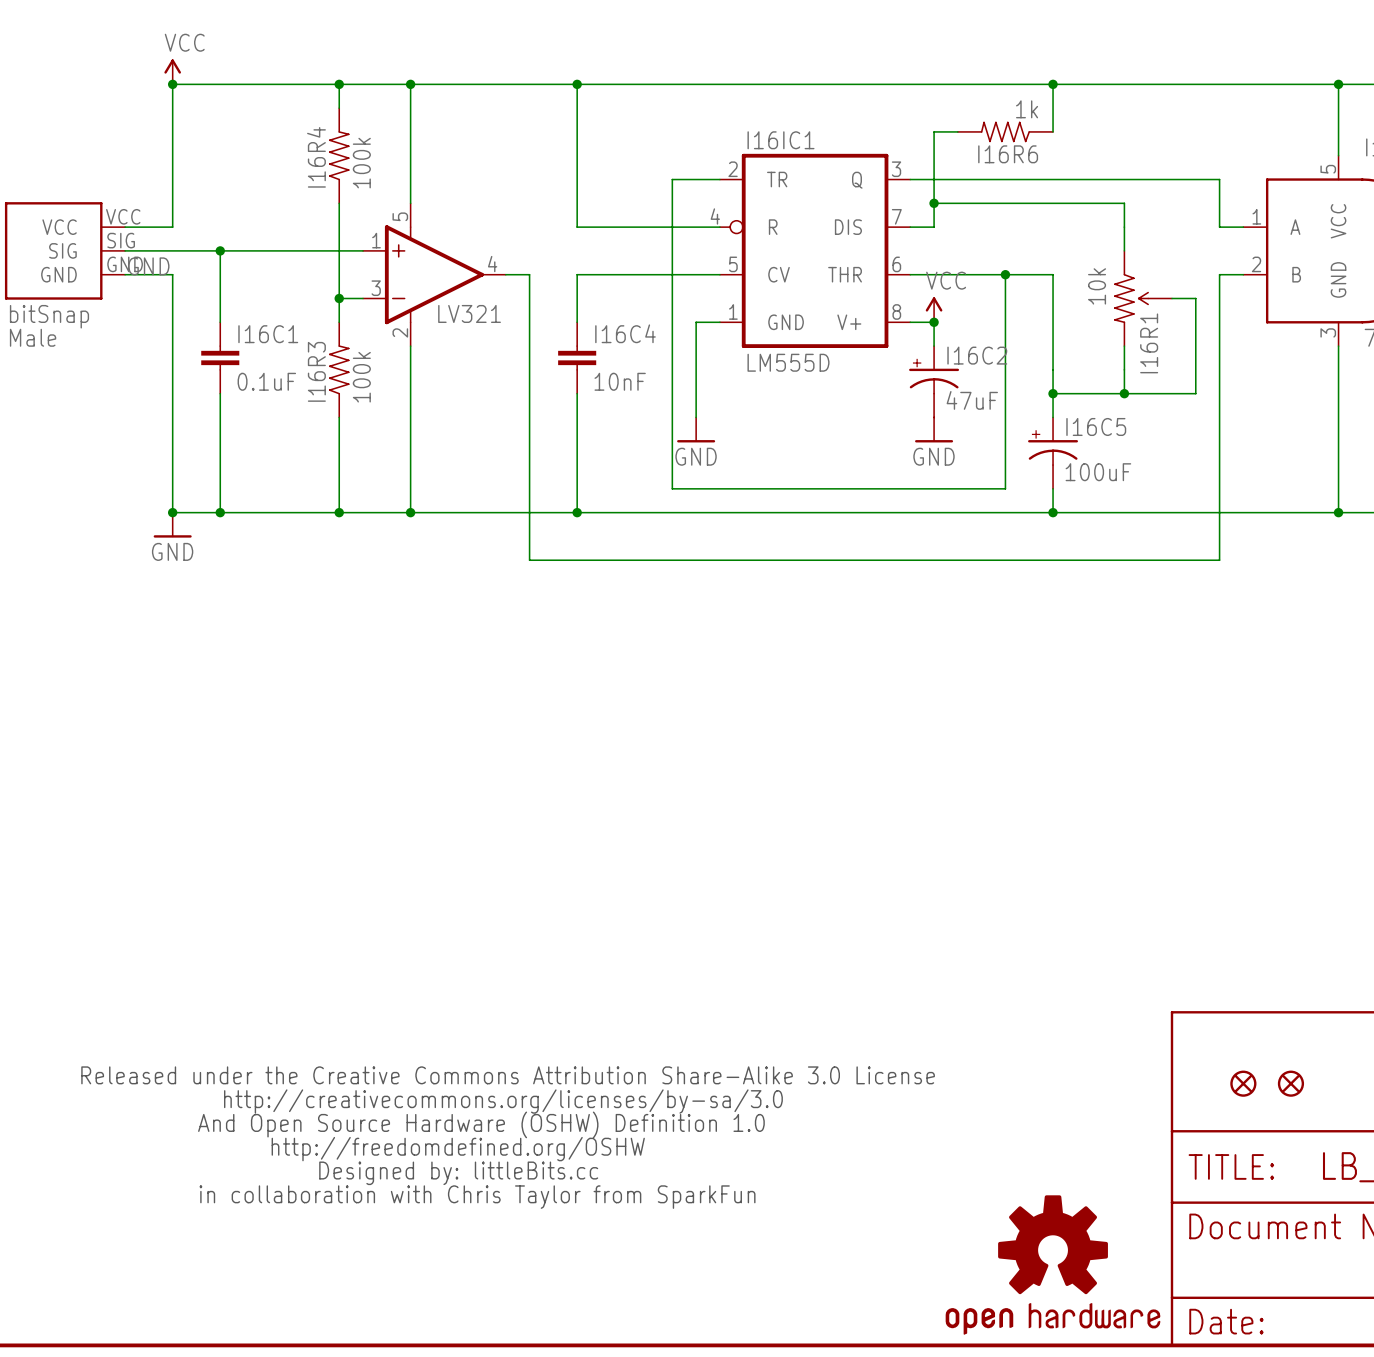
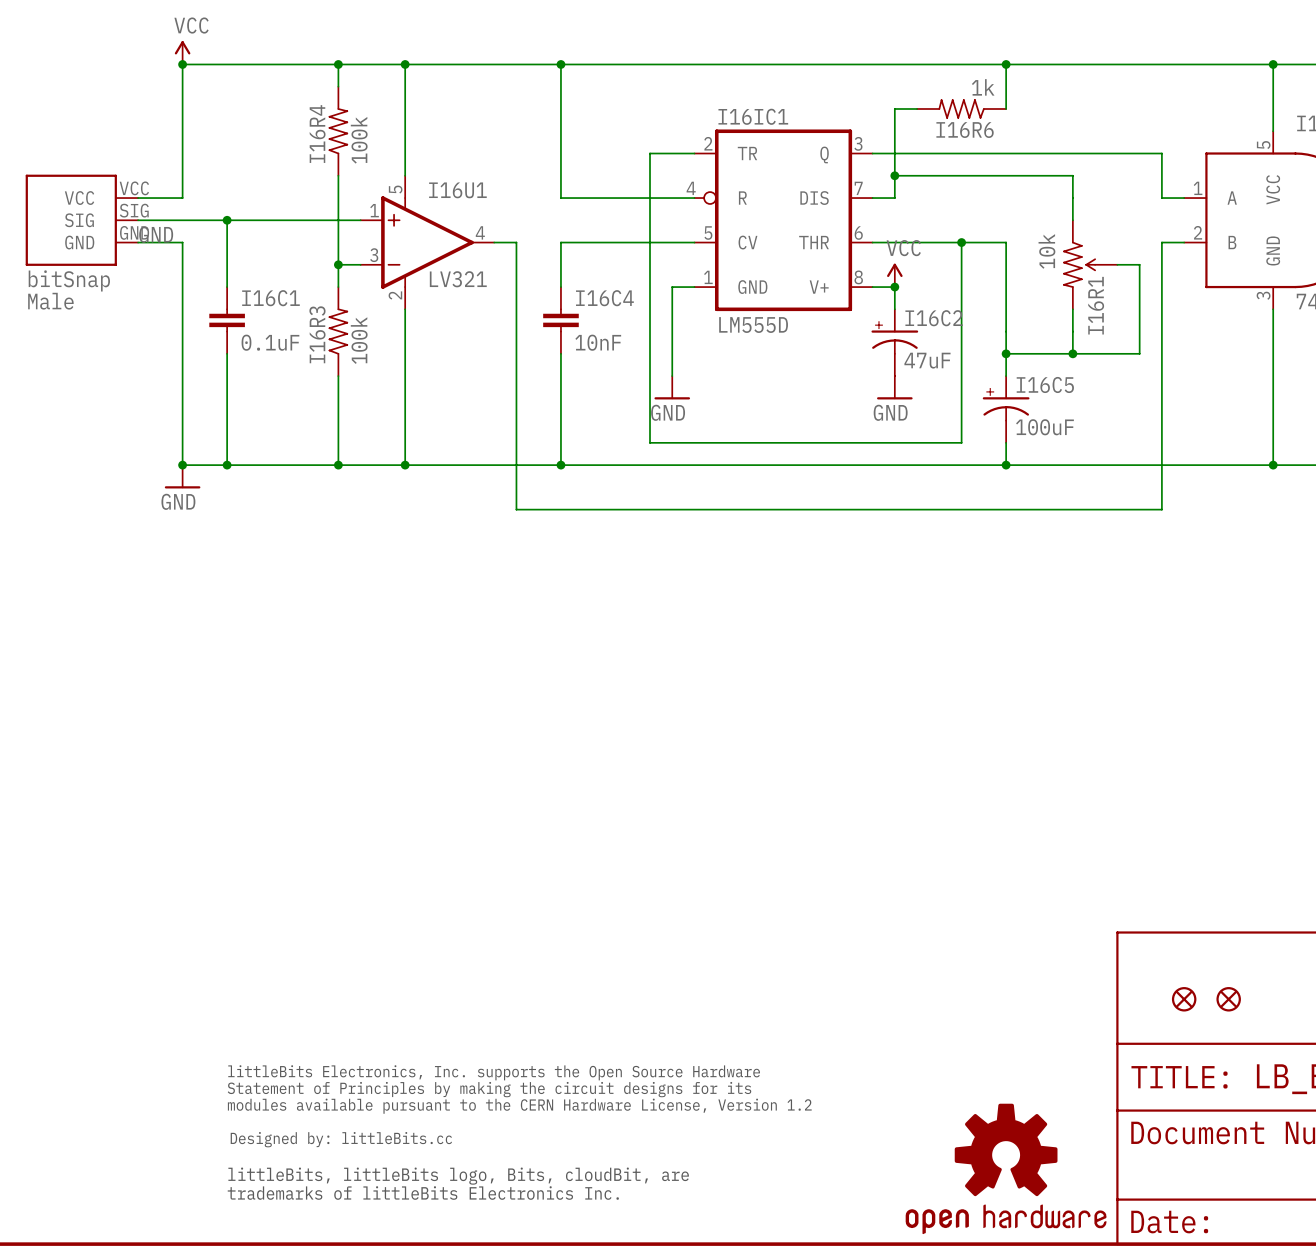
I16U1 name: none -> I16U1 (457, 190)
part: (508, 1137) -> none
part: none -> (519, 1132)

